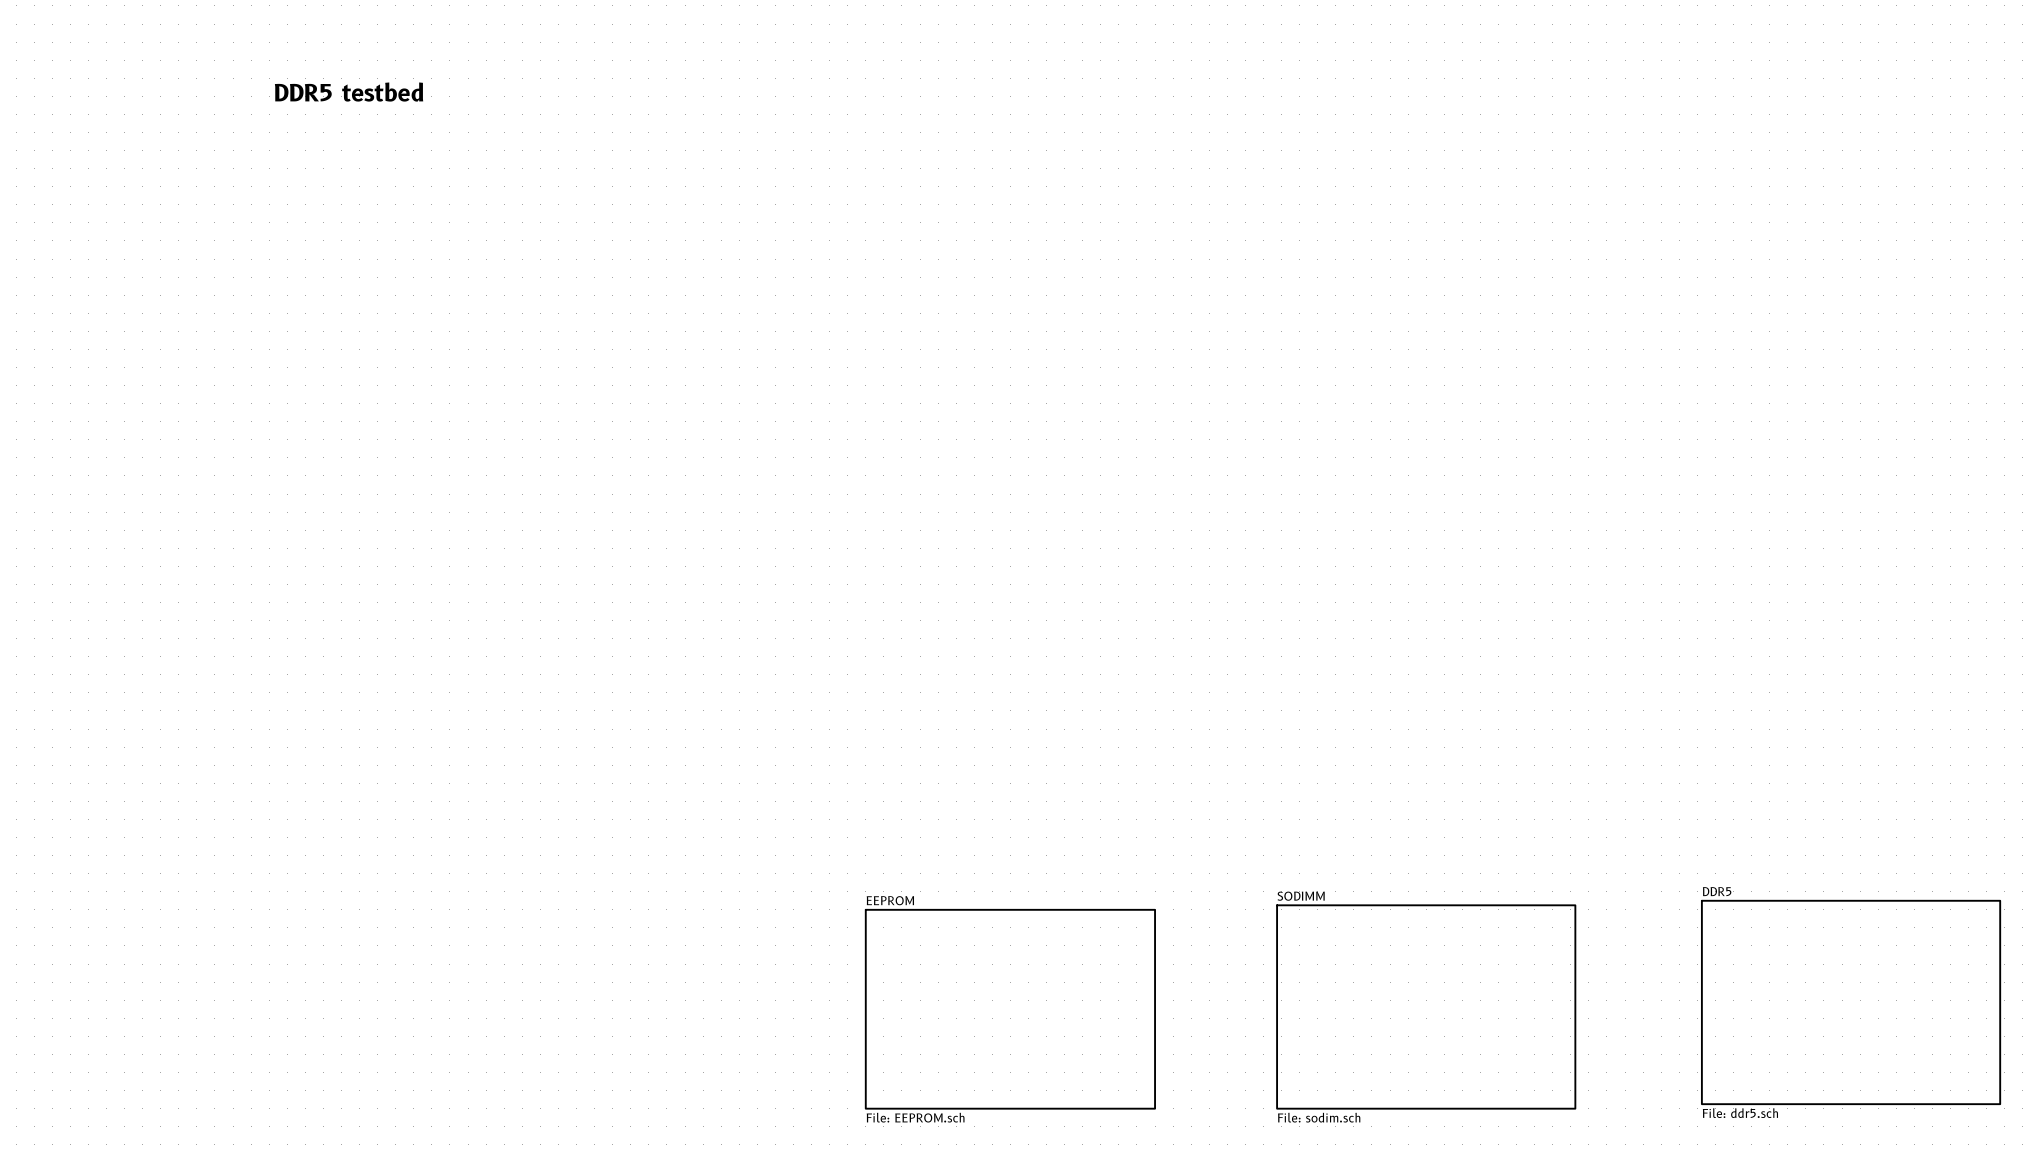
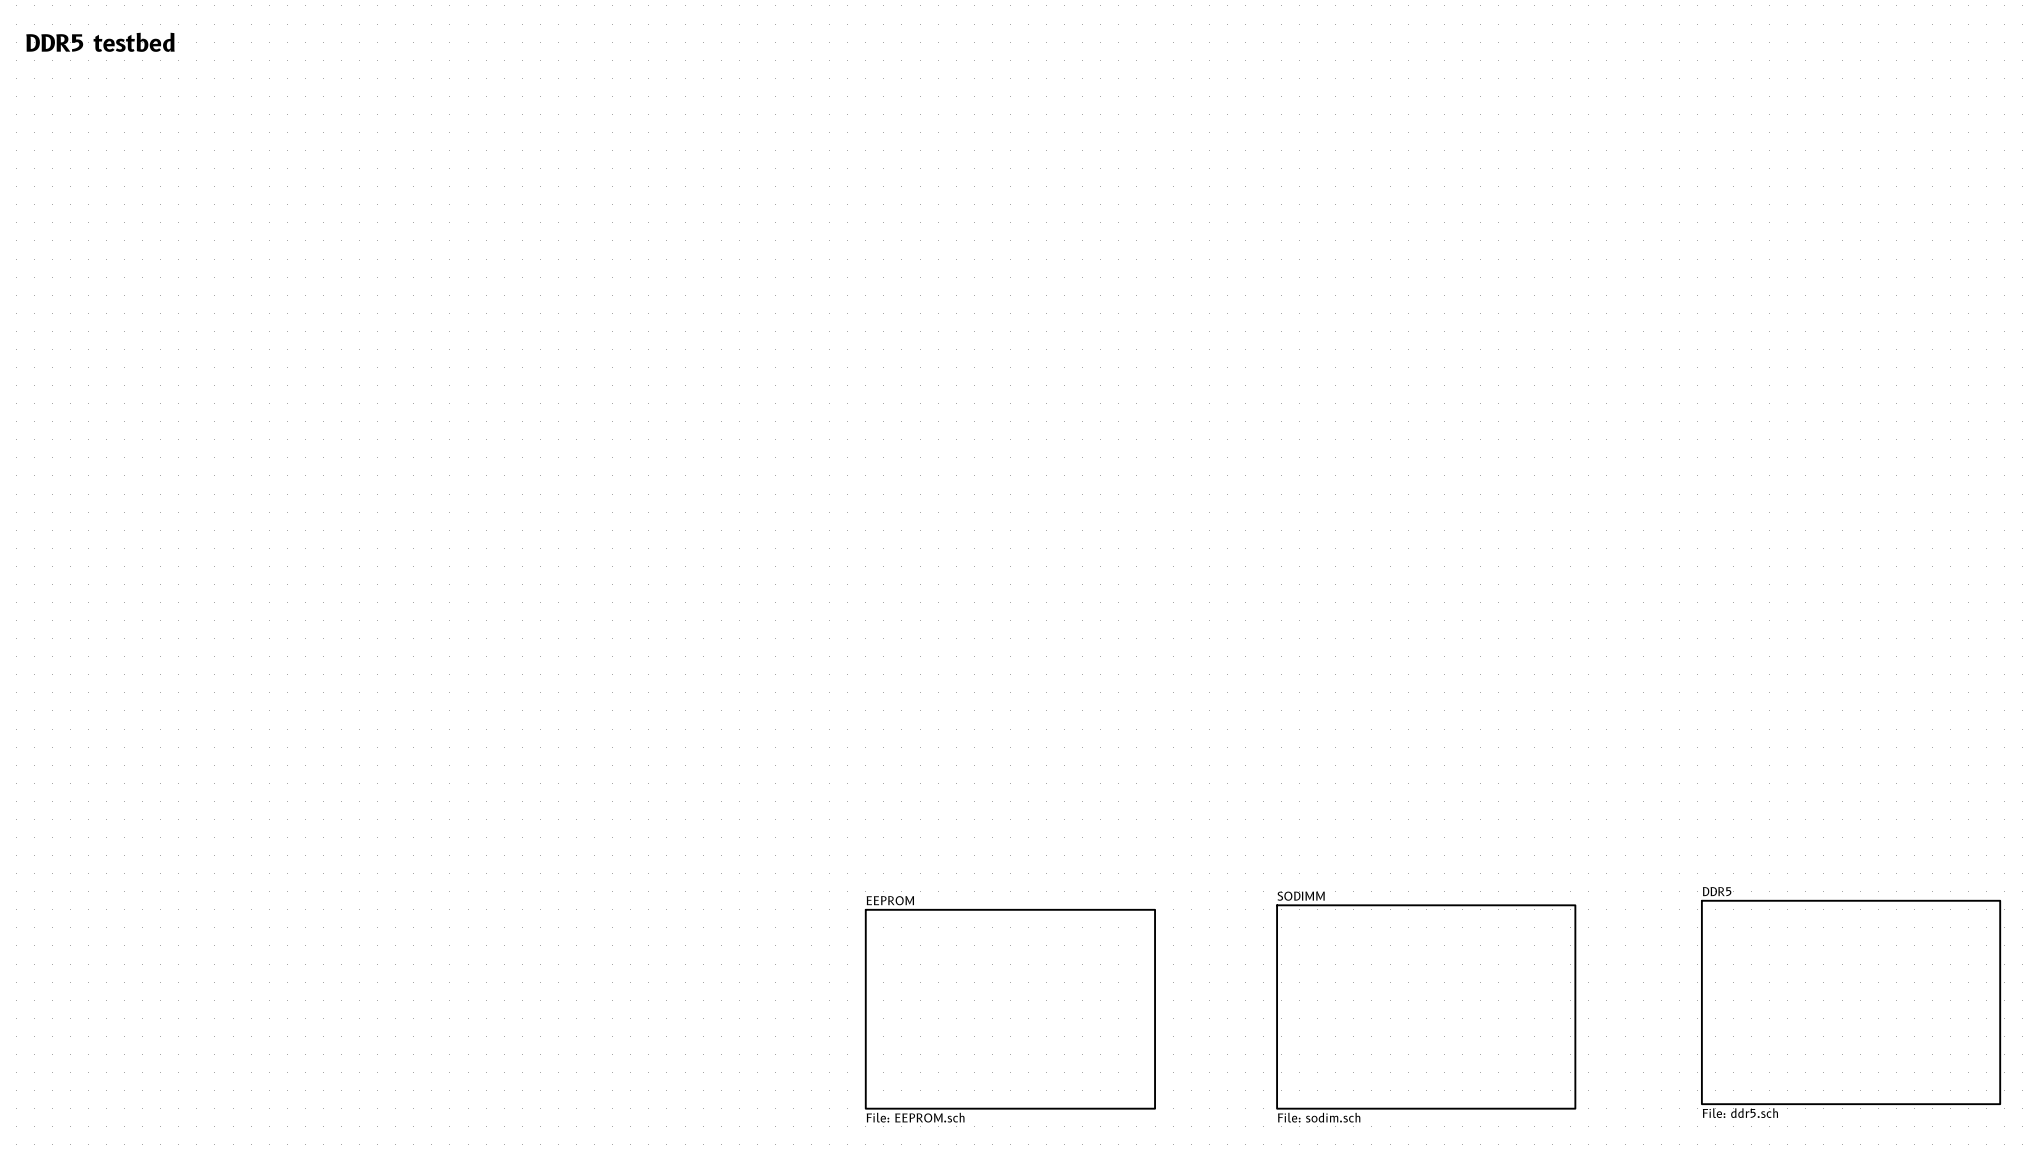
text: none -> DDR5 testbed (100, 42)
text: DDR5 testbed (349, 92) -> none

